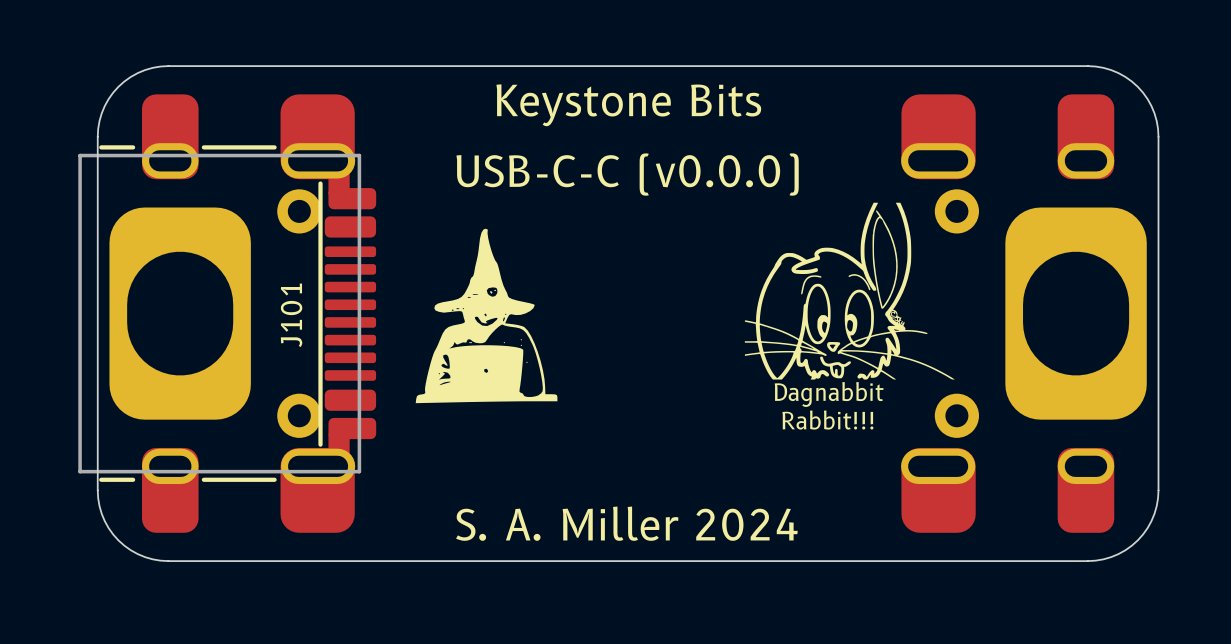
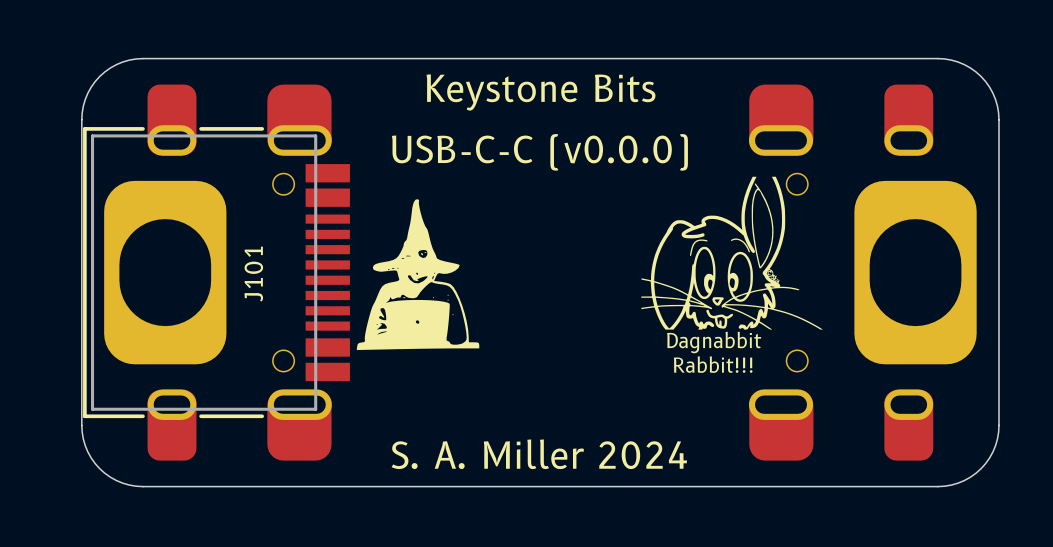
J101 footprint: [78, 94, 377, 533] -> [83, 84, 350, 461]
part footprint: [901, 94, 1147, 533] -> [748, 84, 977, 461]

